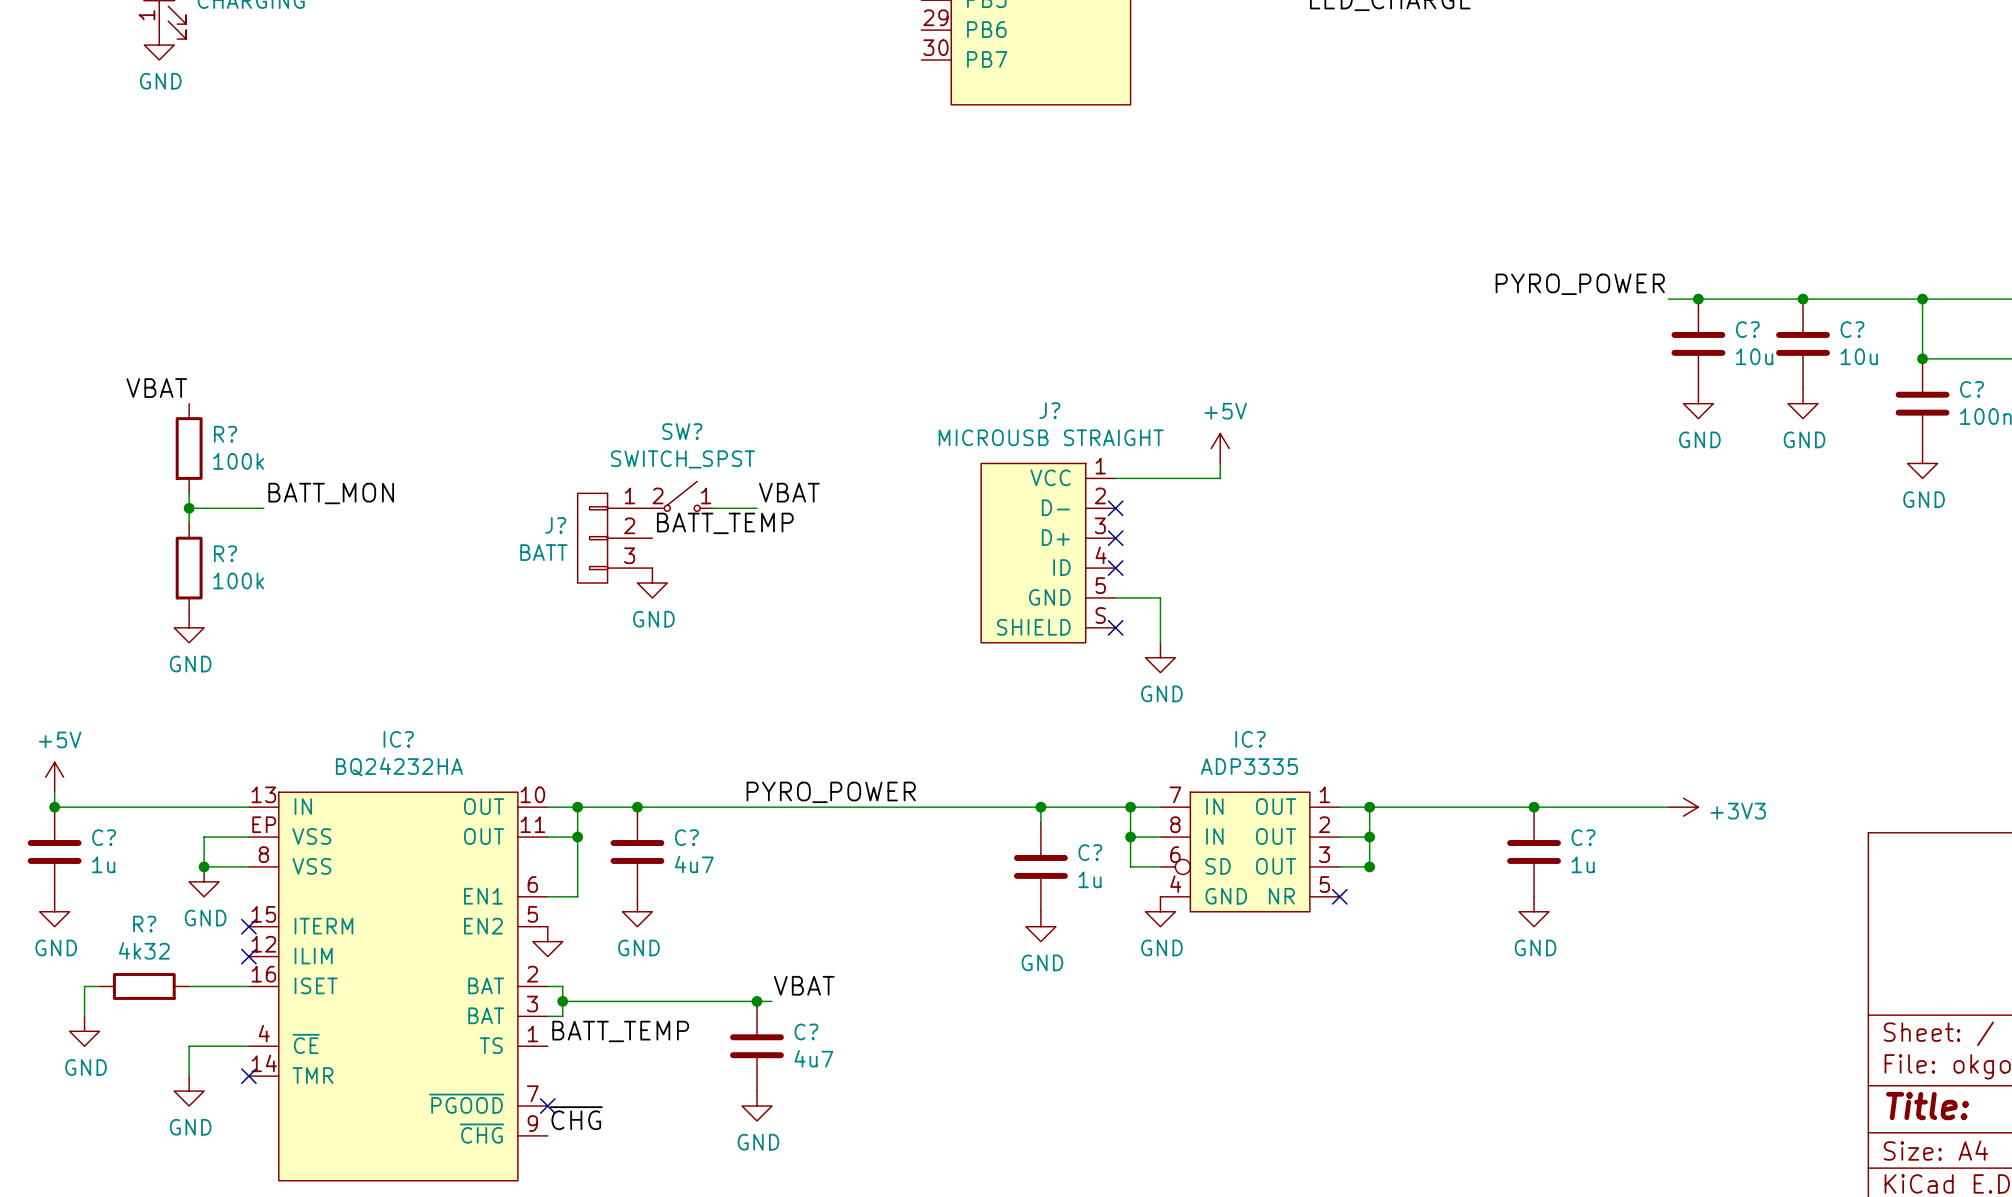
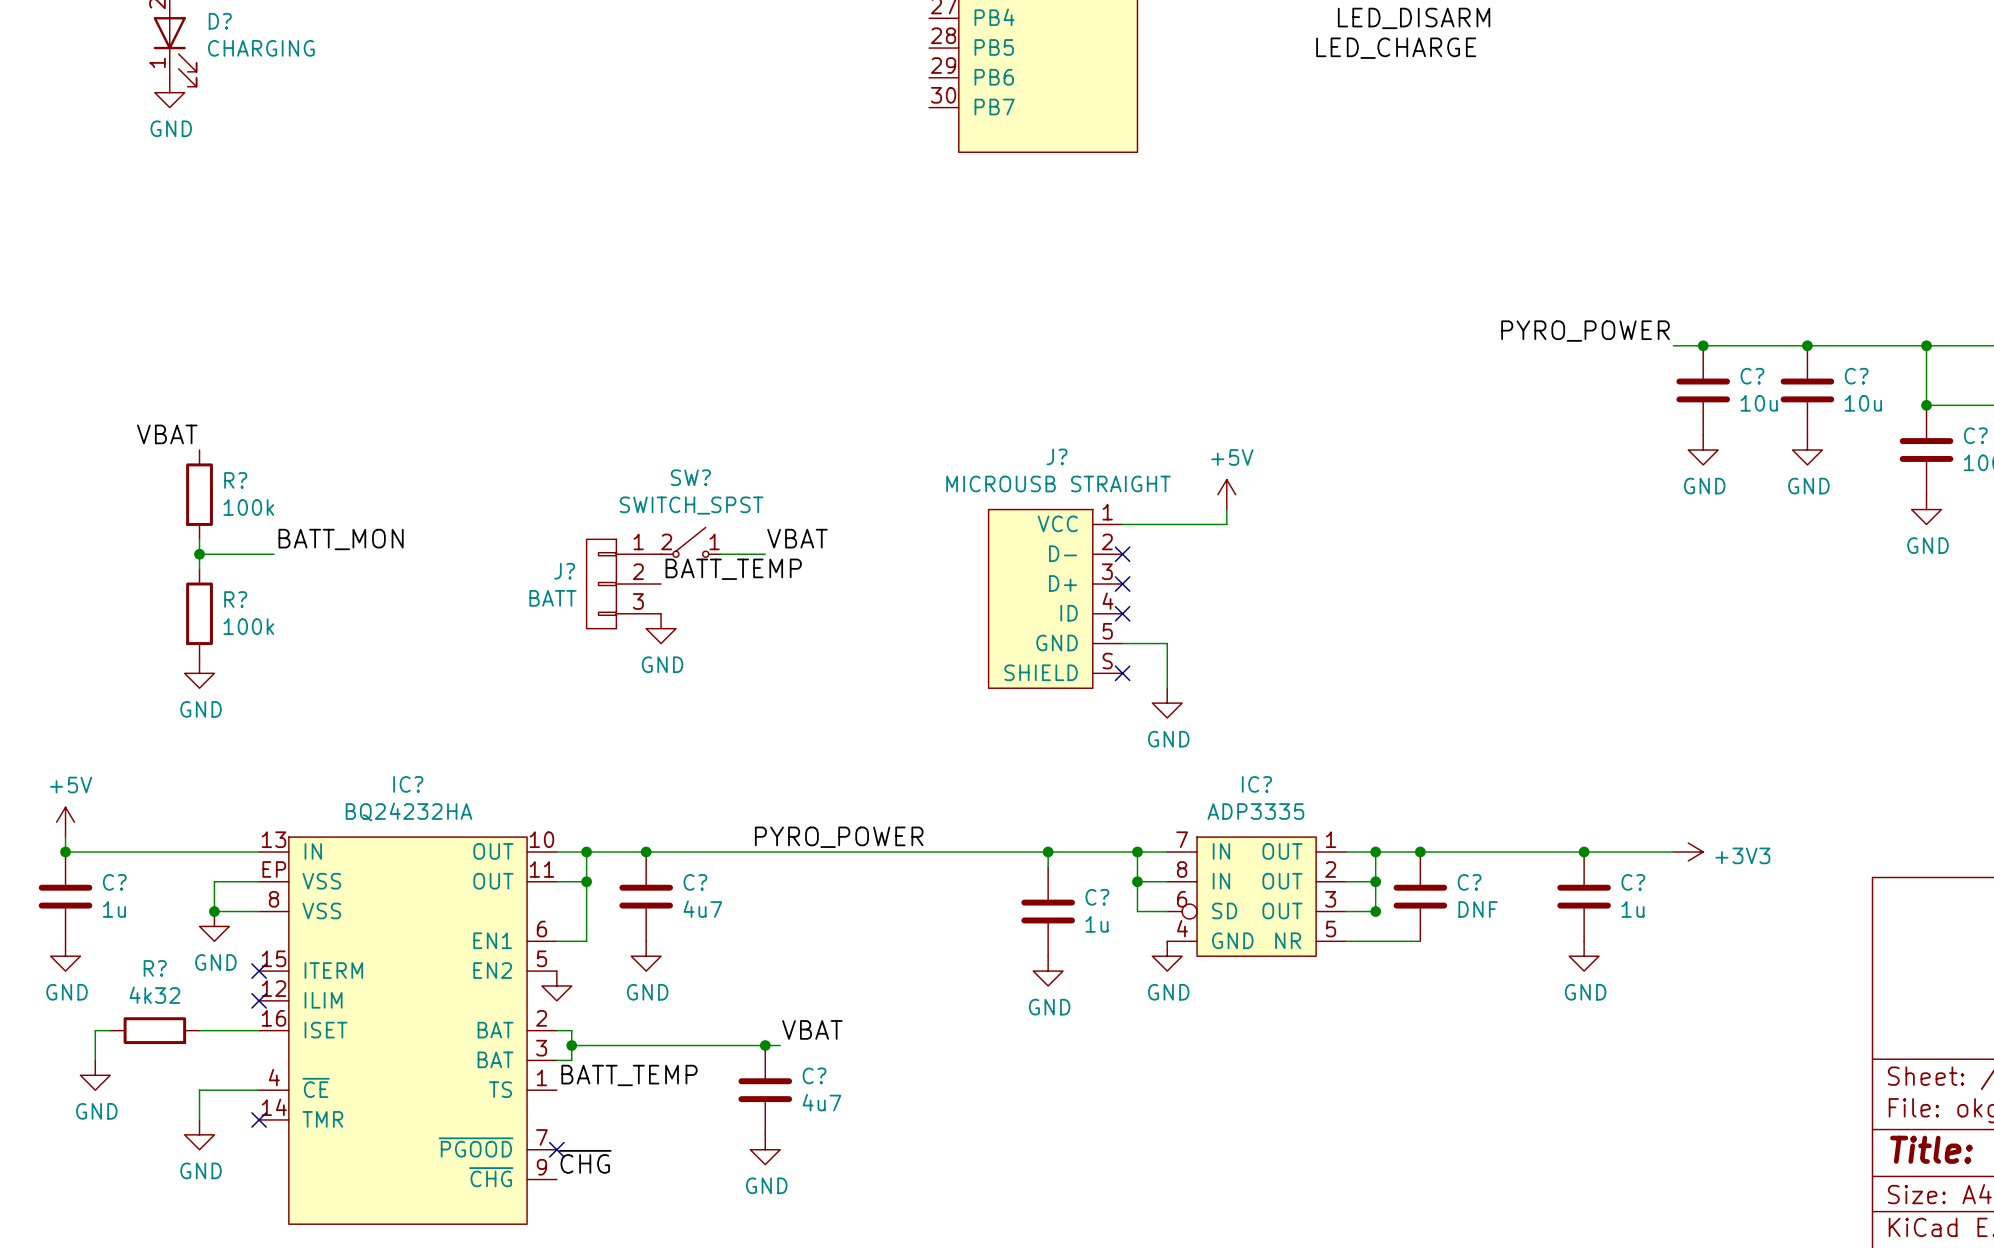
junction: none -> (1420, 851)
junction position: (1534, 807) -> (1584, 851)
C?: none -> DNF (1420, 896)
C? position: (1534, 851) -> (1584, 896)
wire: none -> (1345, 941) (1420, 941)
no-connect mark: (1339, 896) -> none
power symbol position: GND (1534, 911) -> GND (1584, 956)

